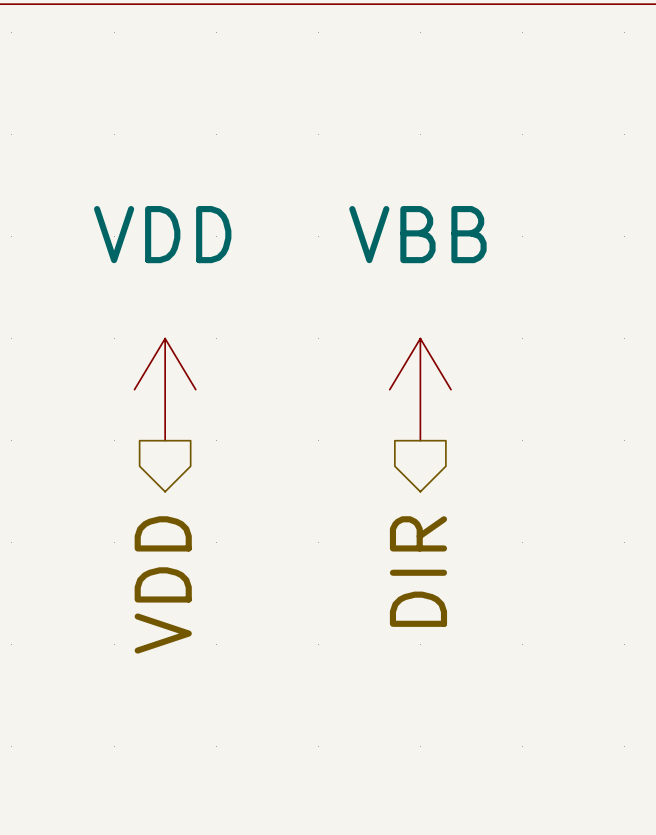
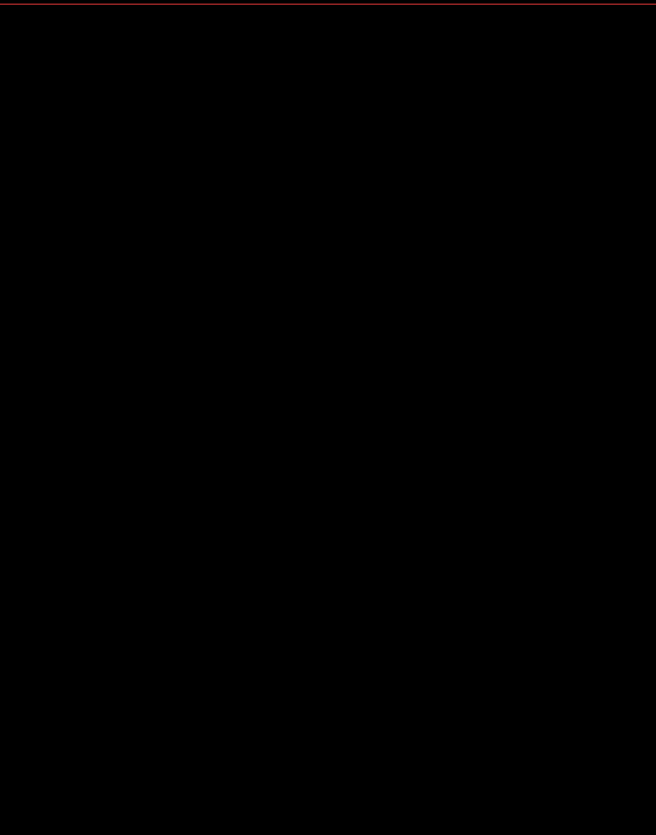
power symbol: VDD (165, 389) -> none
power symbol: VBB (420, 389) -> none
hierarchical label: DIR (418, 571) -> none
hierarchical label: VDD (163, 584) -> none

